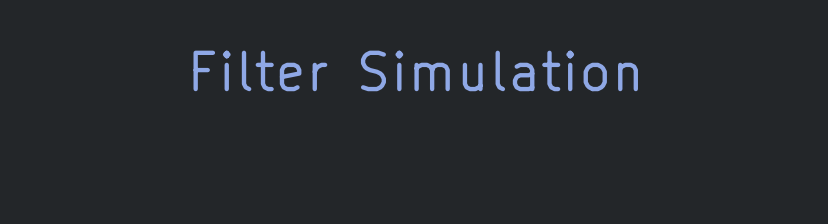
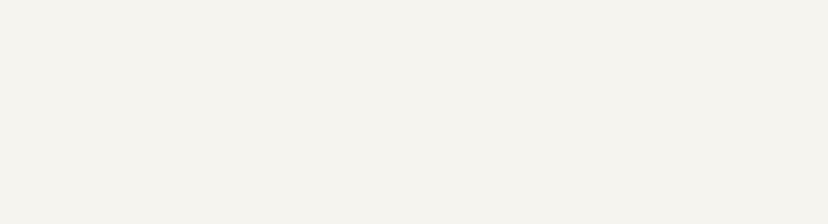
text: Filter Simulation (415, 70) -> none

